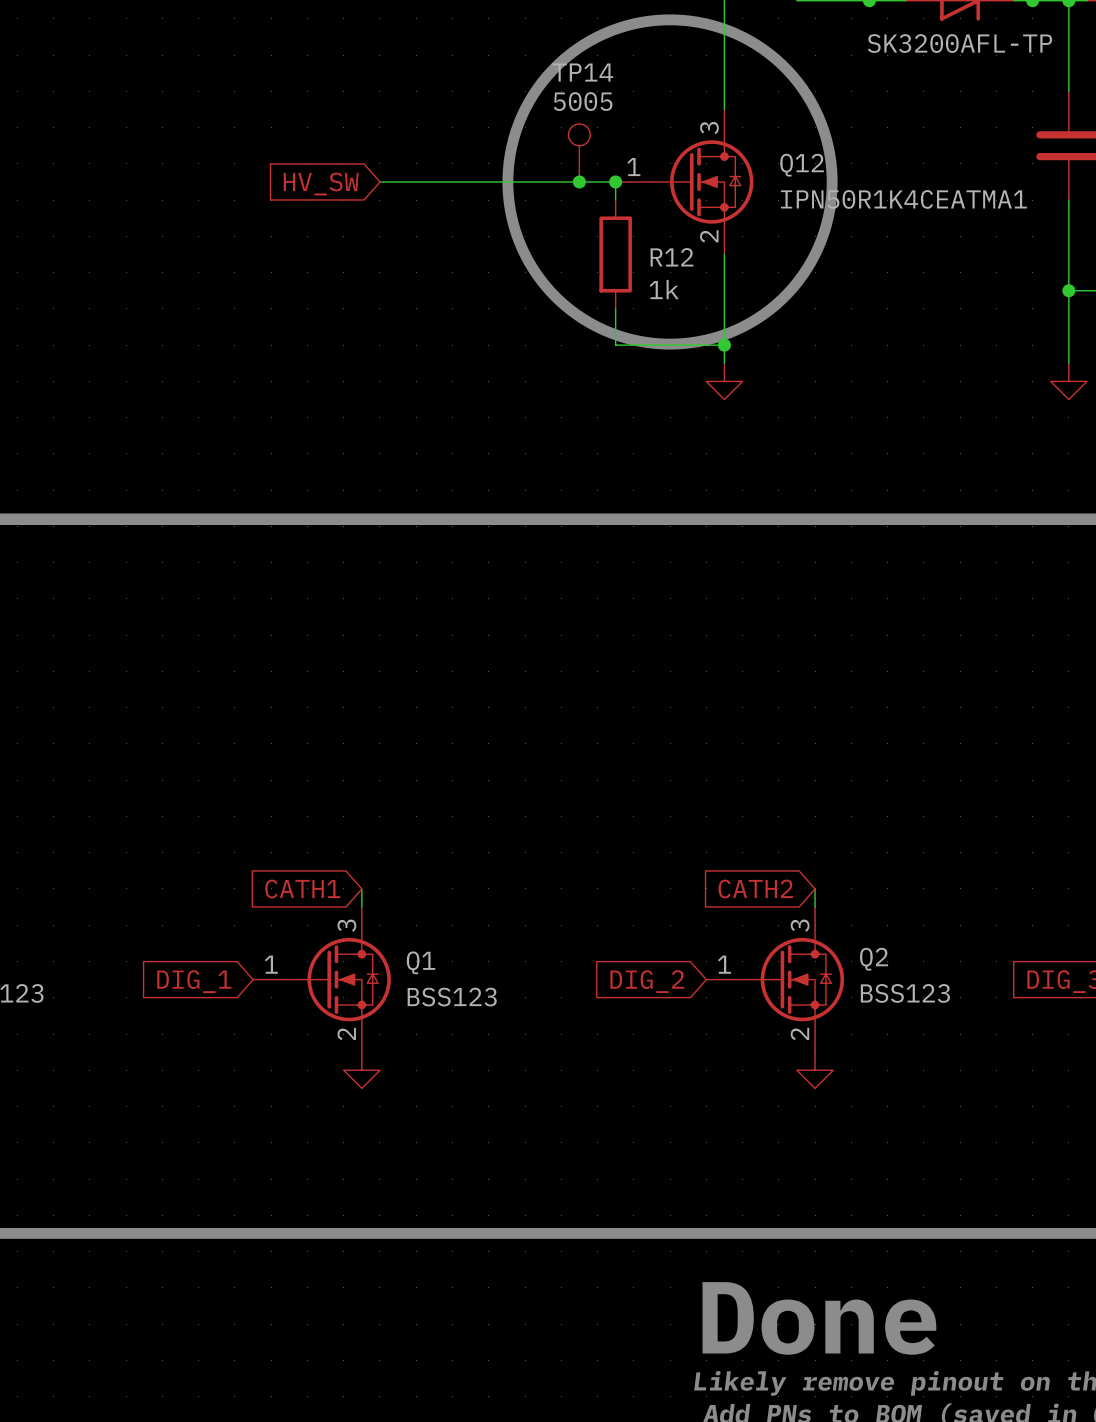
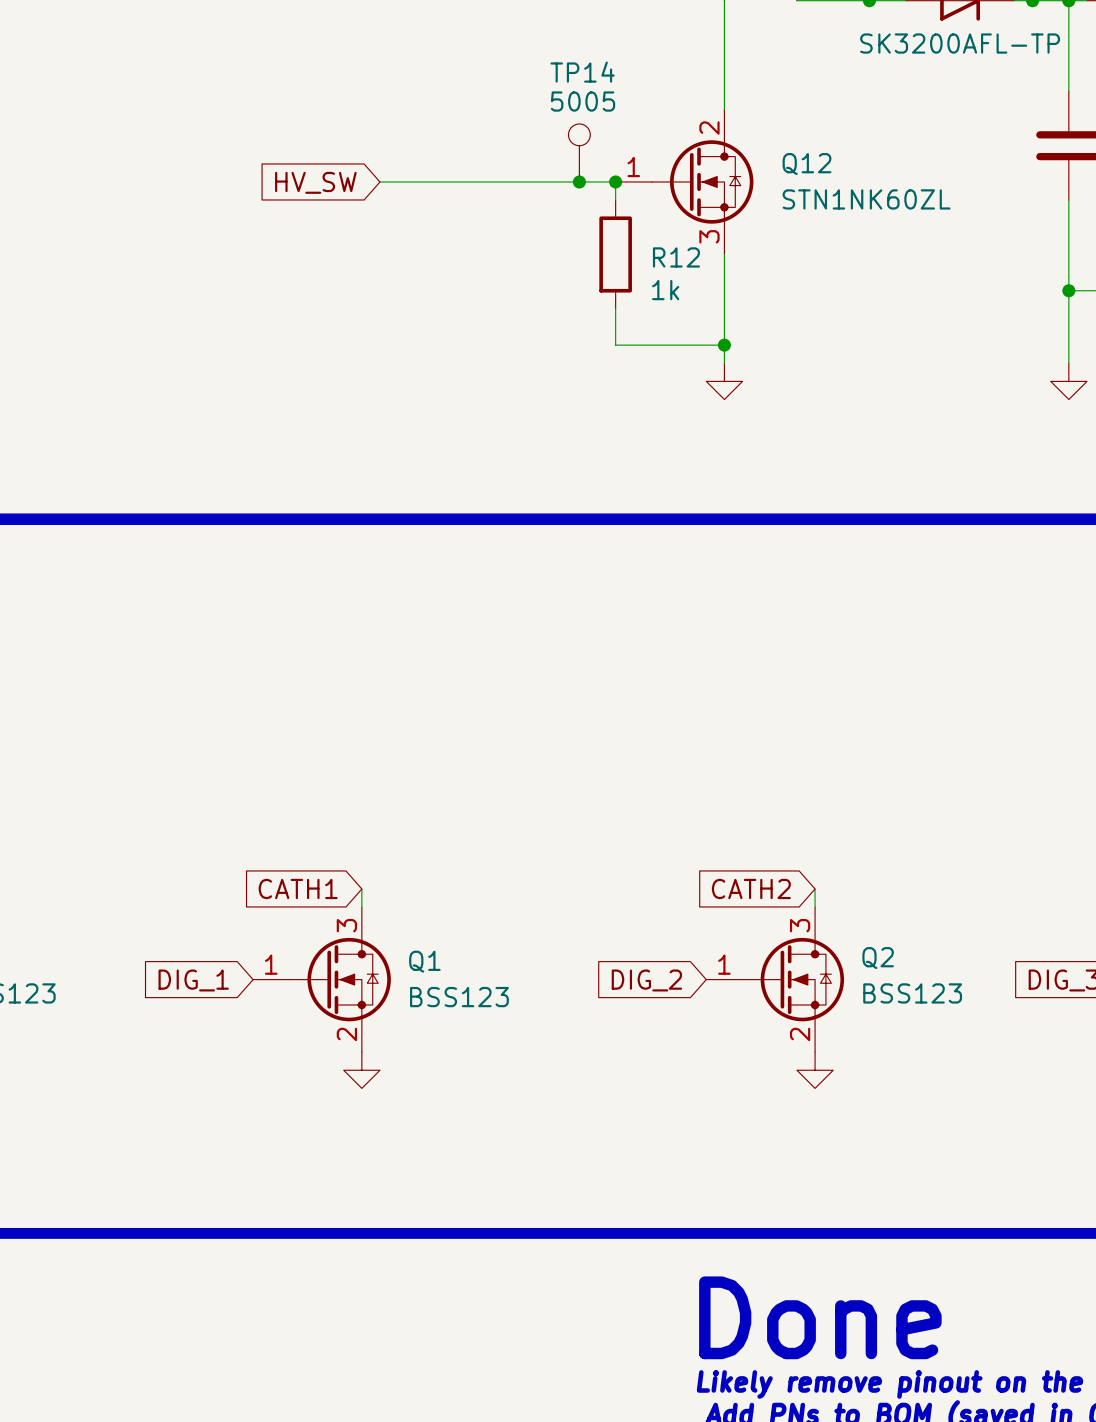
drawing: [502, 14, 838, 350] -> none
Q12 pin number: 3 (709, 128) -> 2 (709, 128)
Q12 value: IPN50R1K4CEATMA1 (903, 199) -> STN1NK60ZL (866, 199)
Q12 pin number: 2 (709, 236) -> 3 (709, 236)

